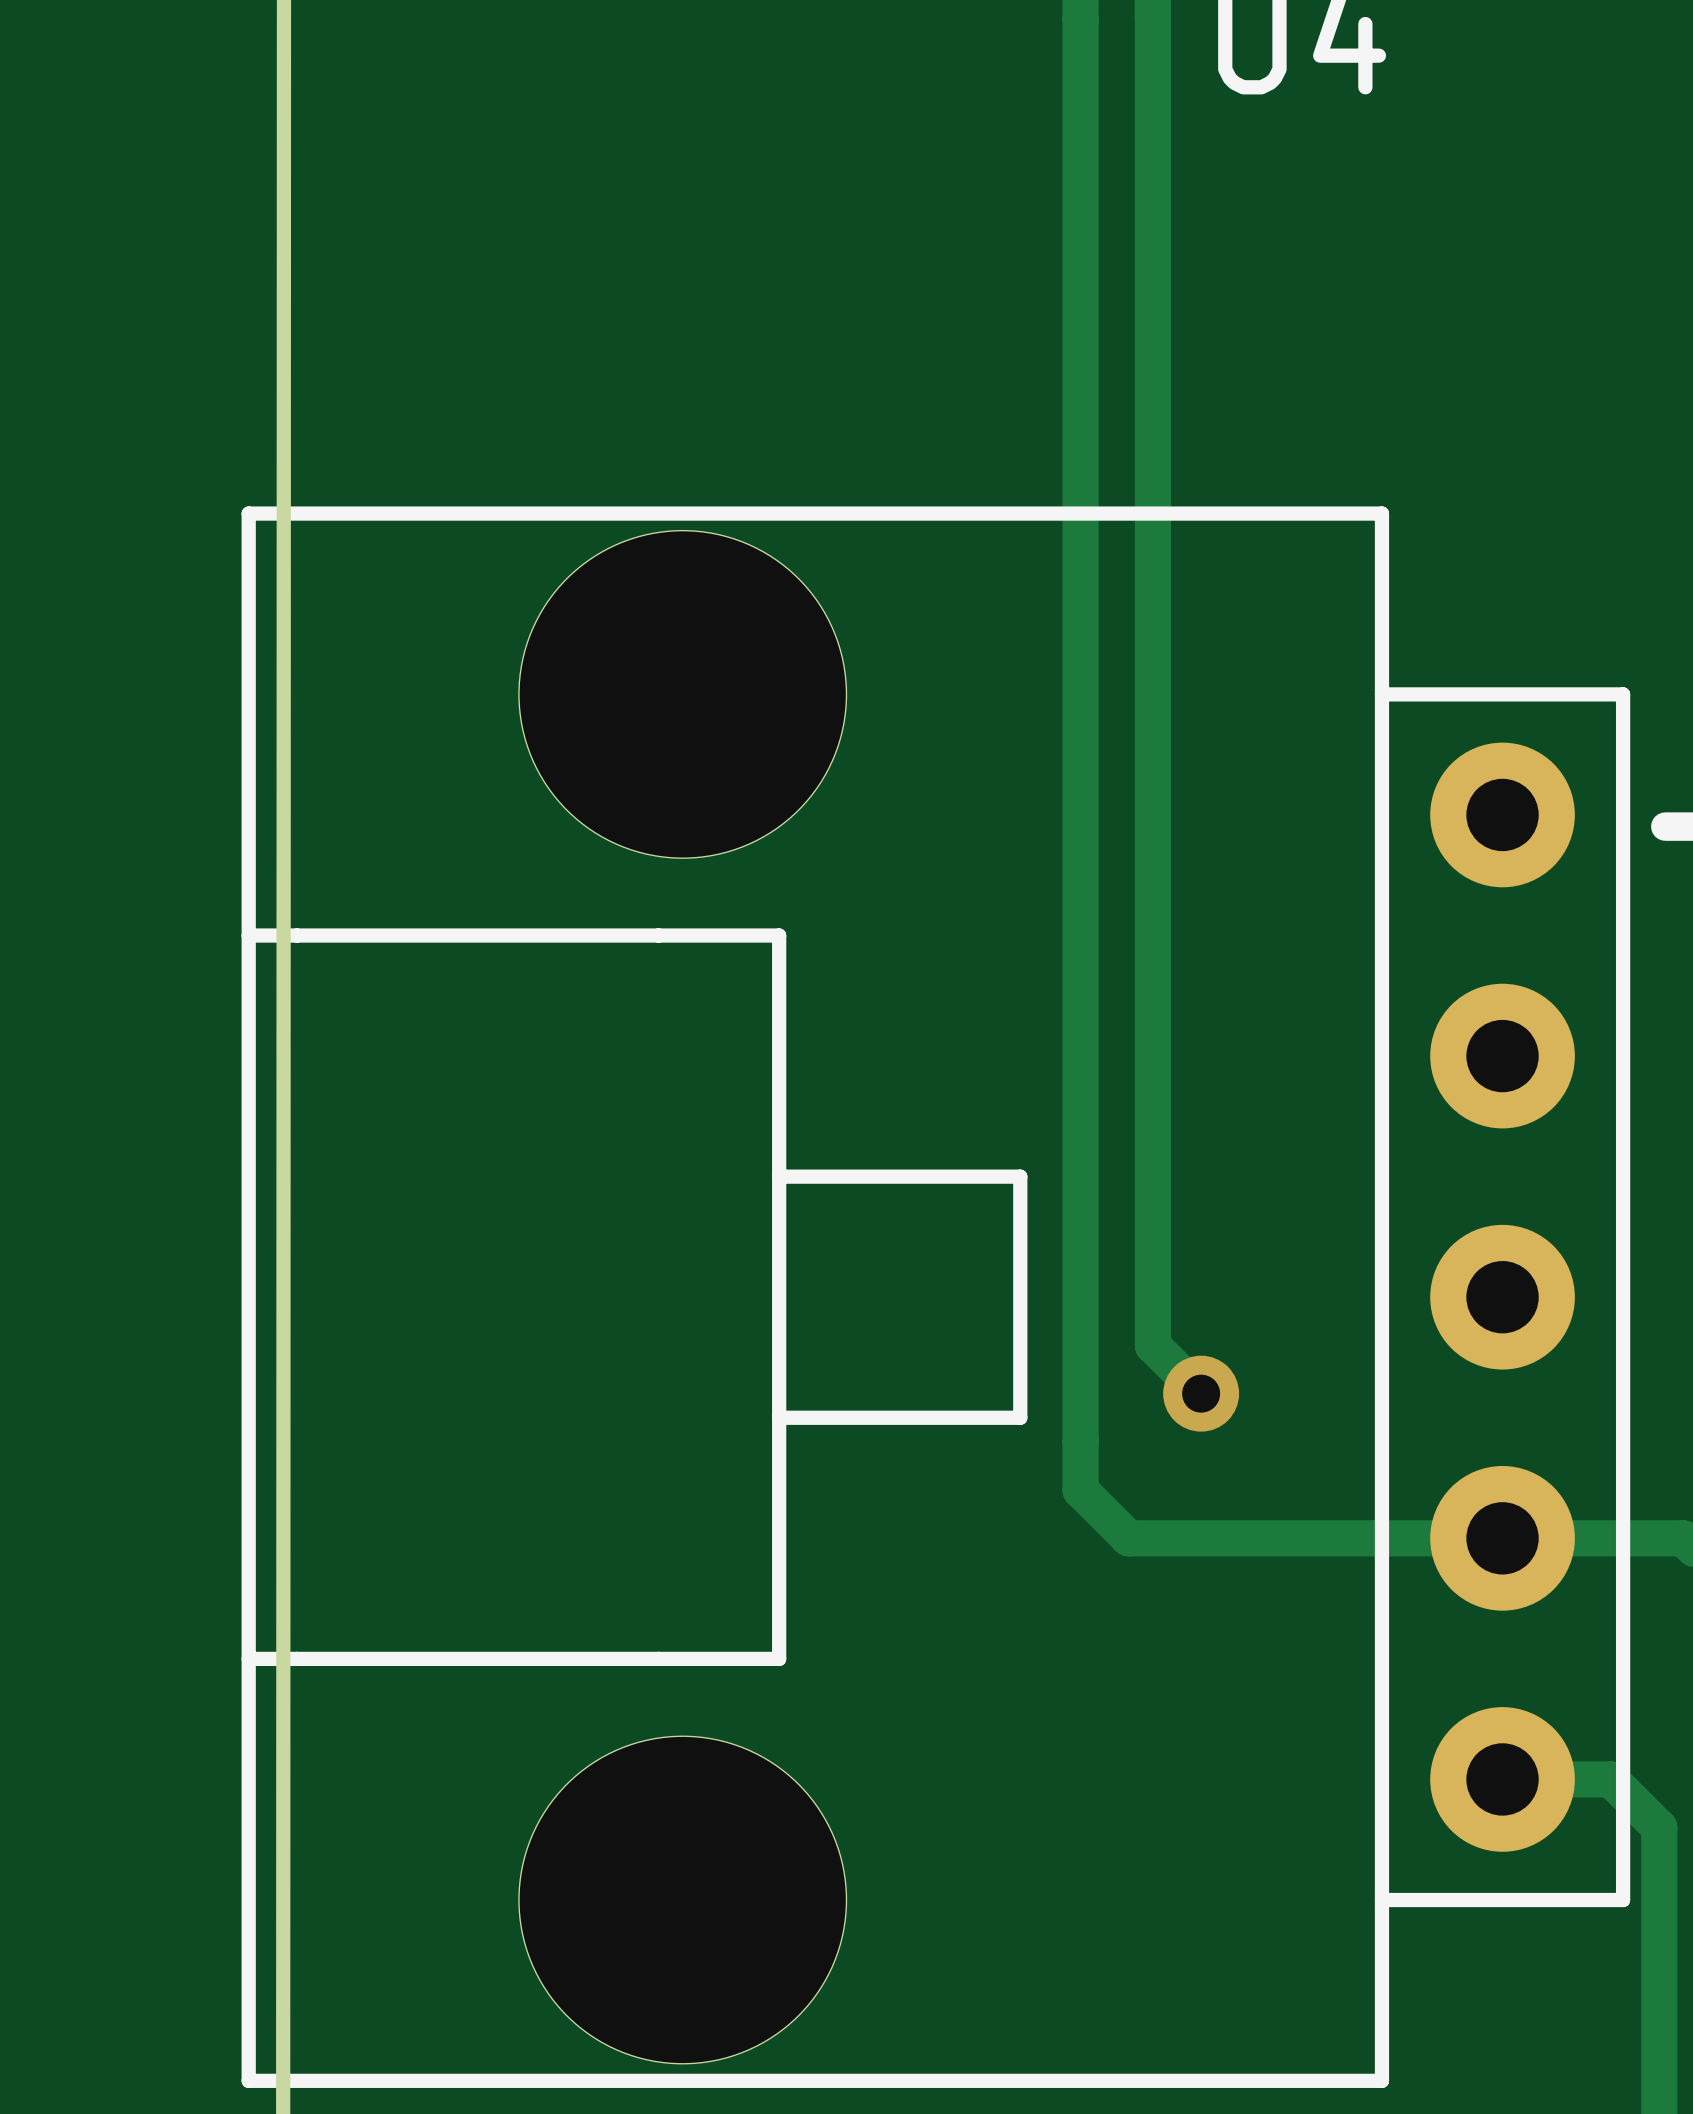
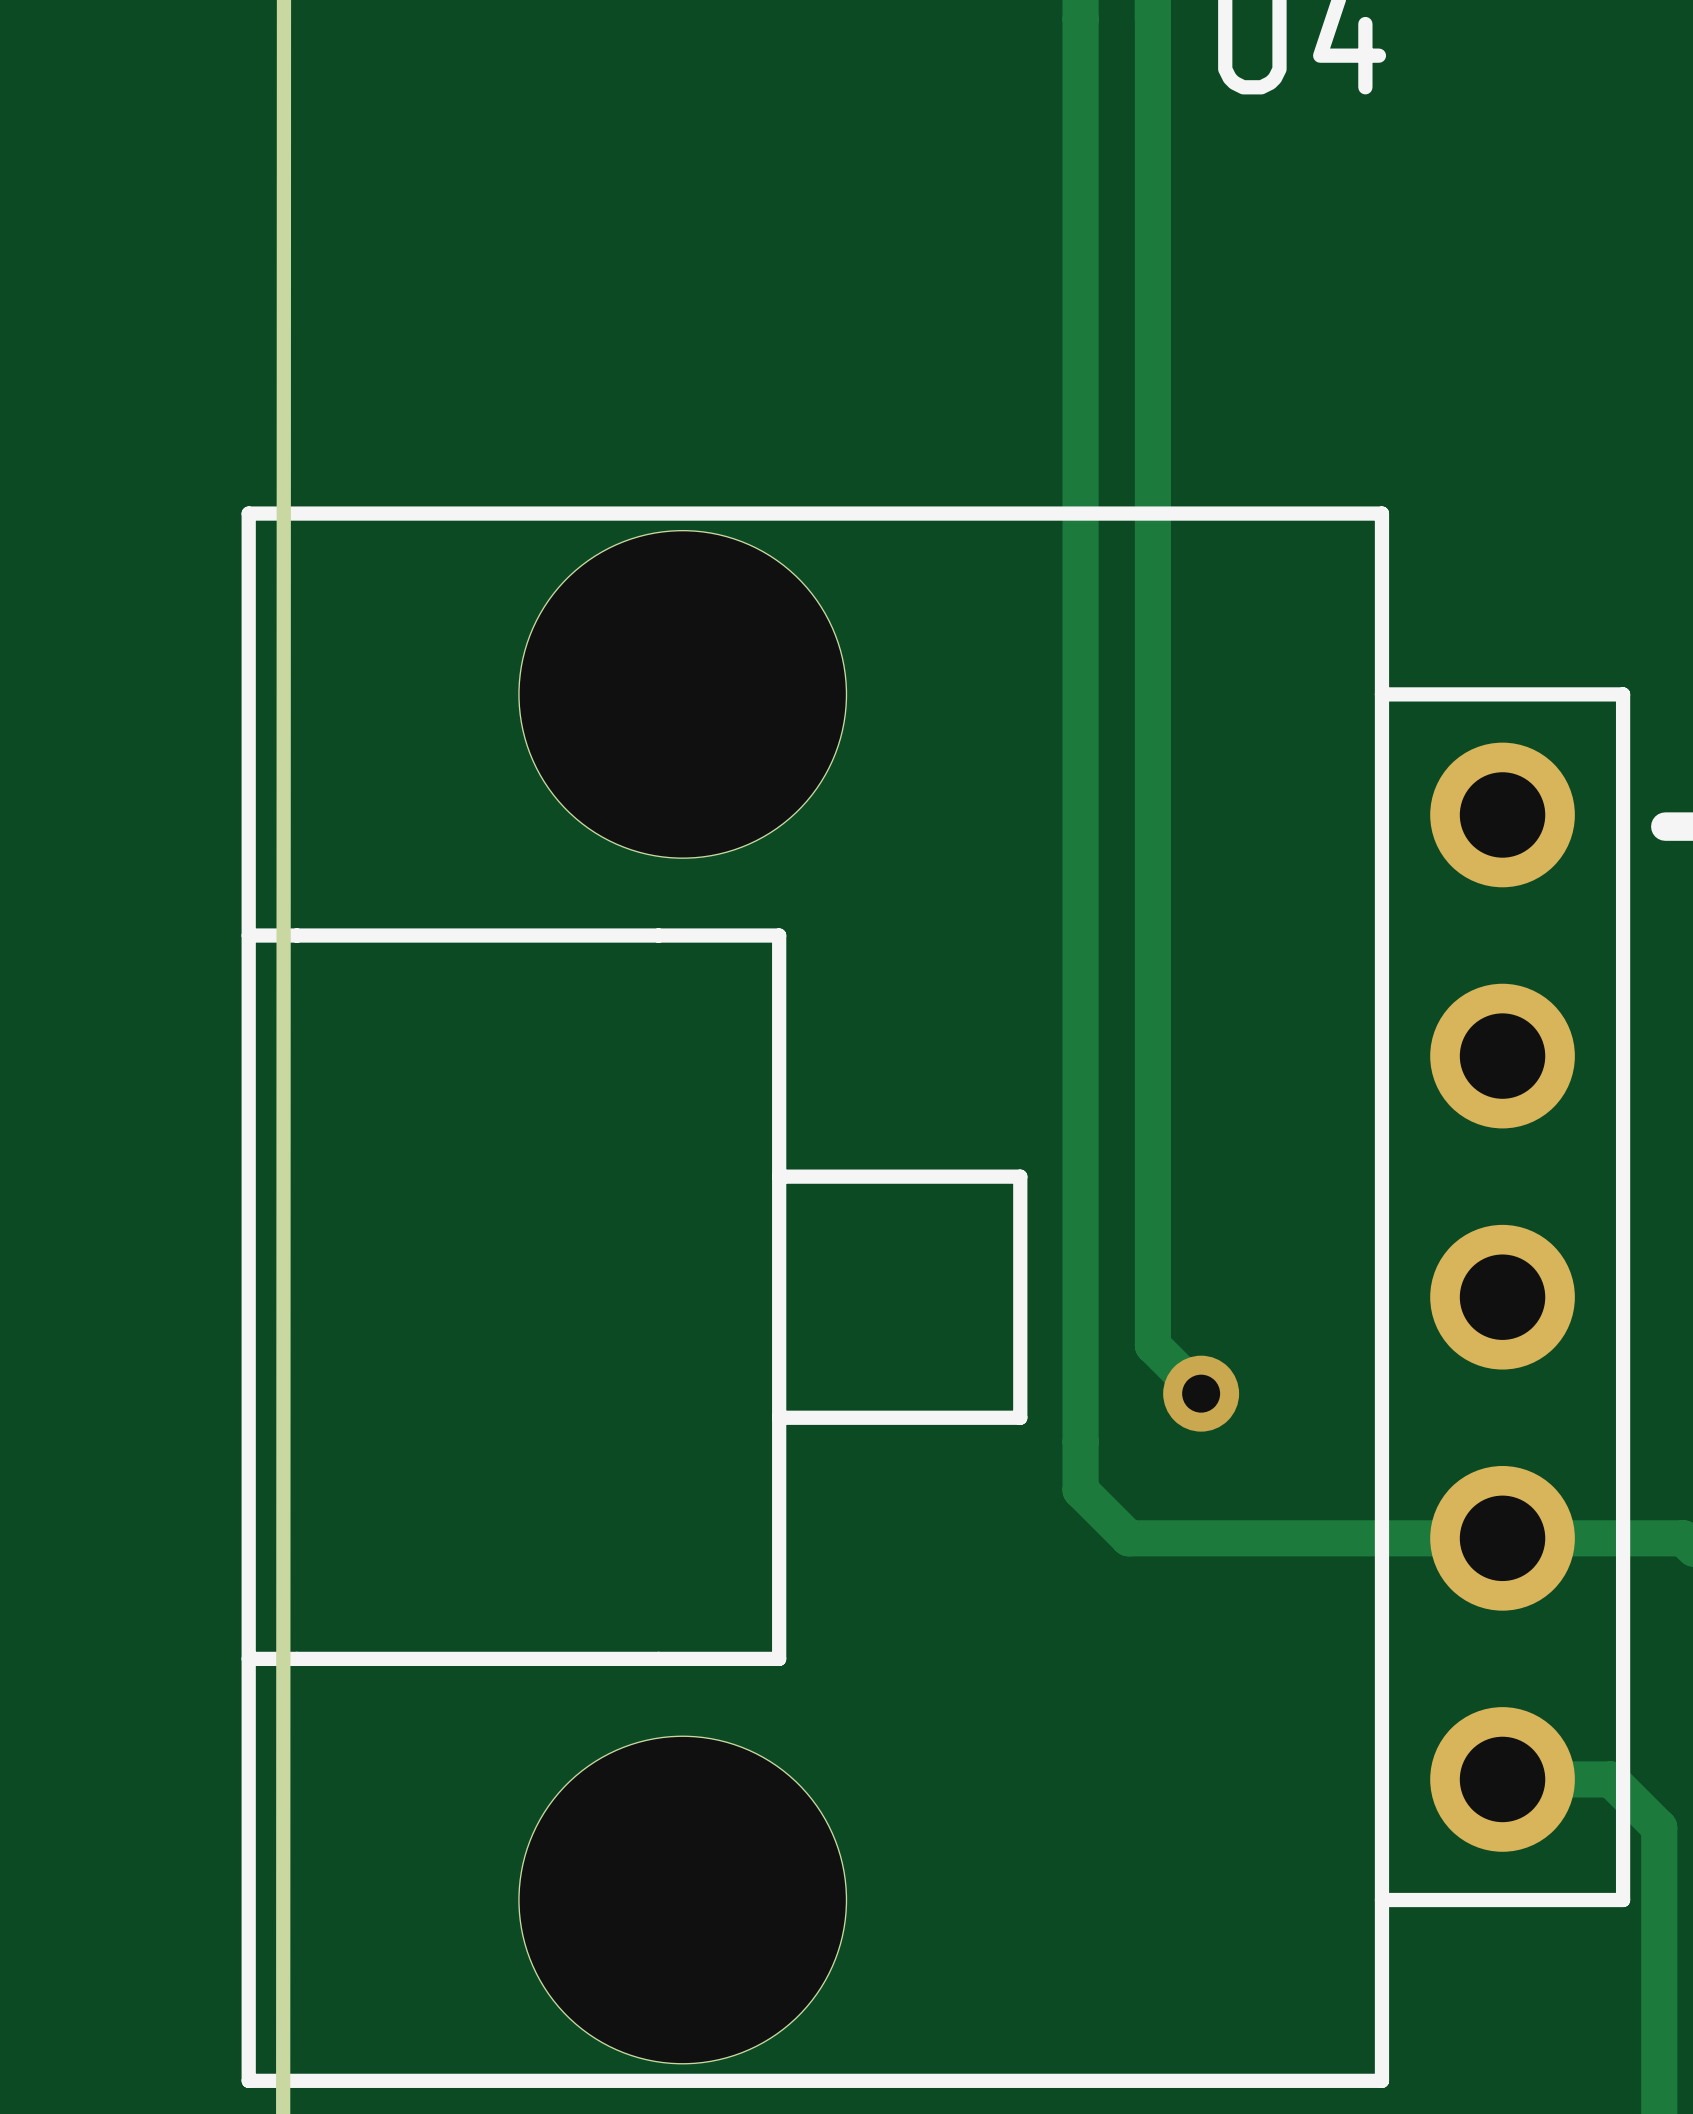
part footprint: [241, 506, 1631, 2088] -> [241, 506, 1631, 2088]

